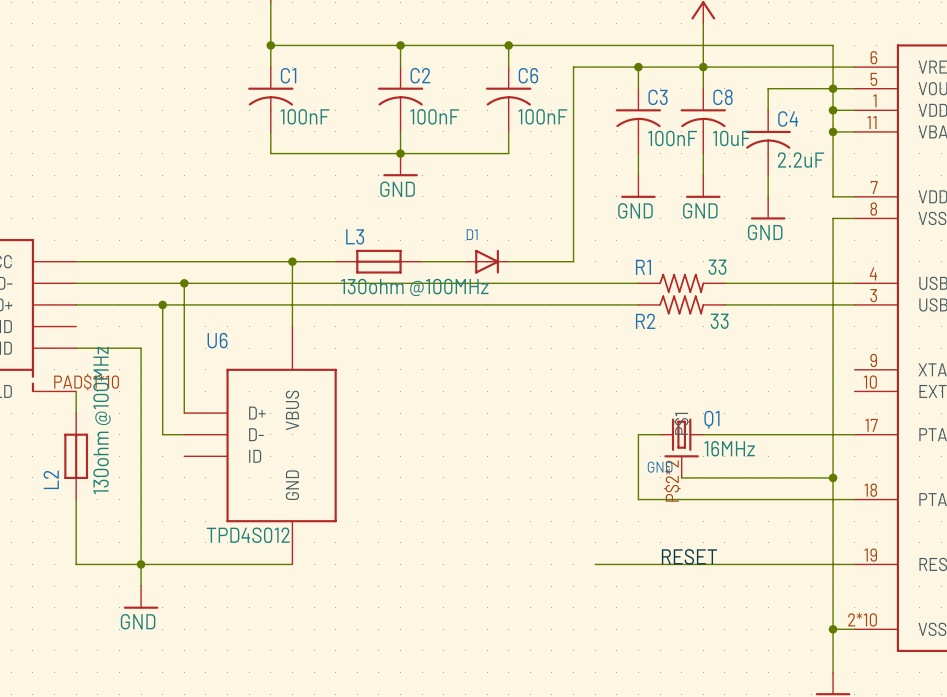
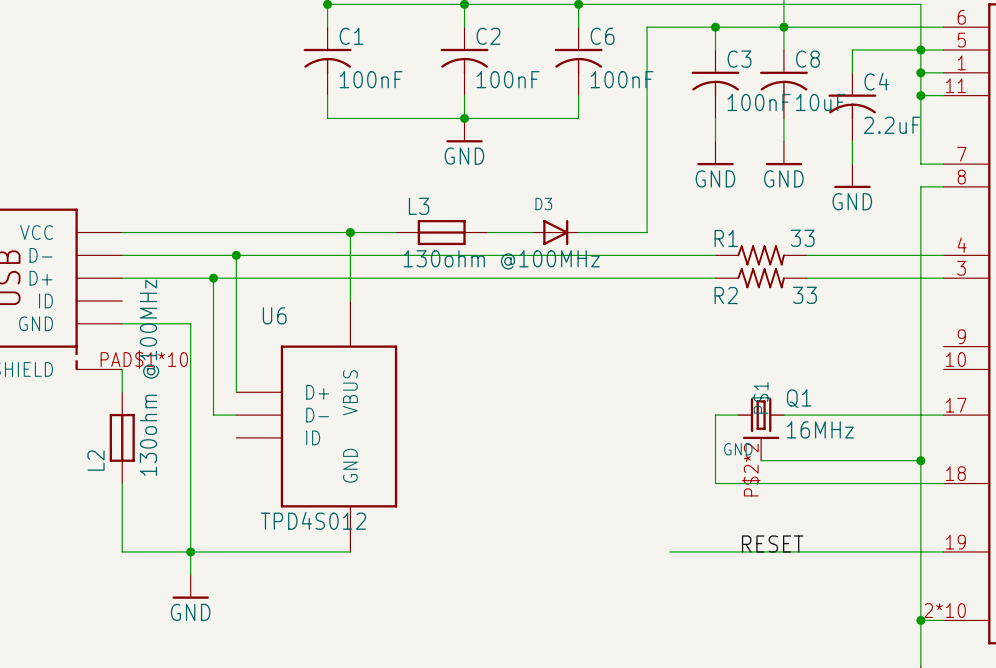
D1 name: D1 (472, 234) -> D3 (543, 204)

